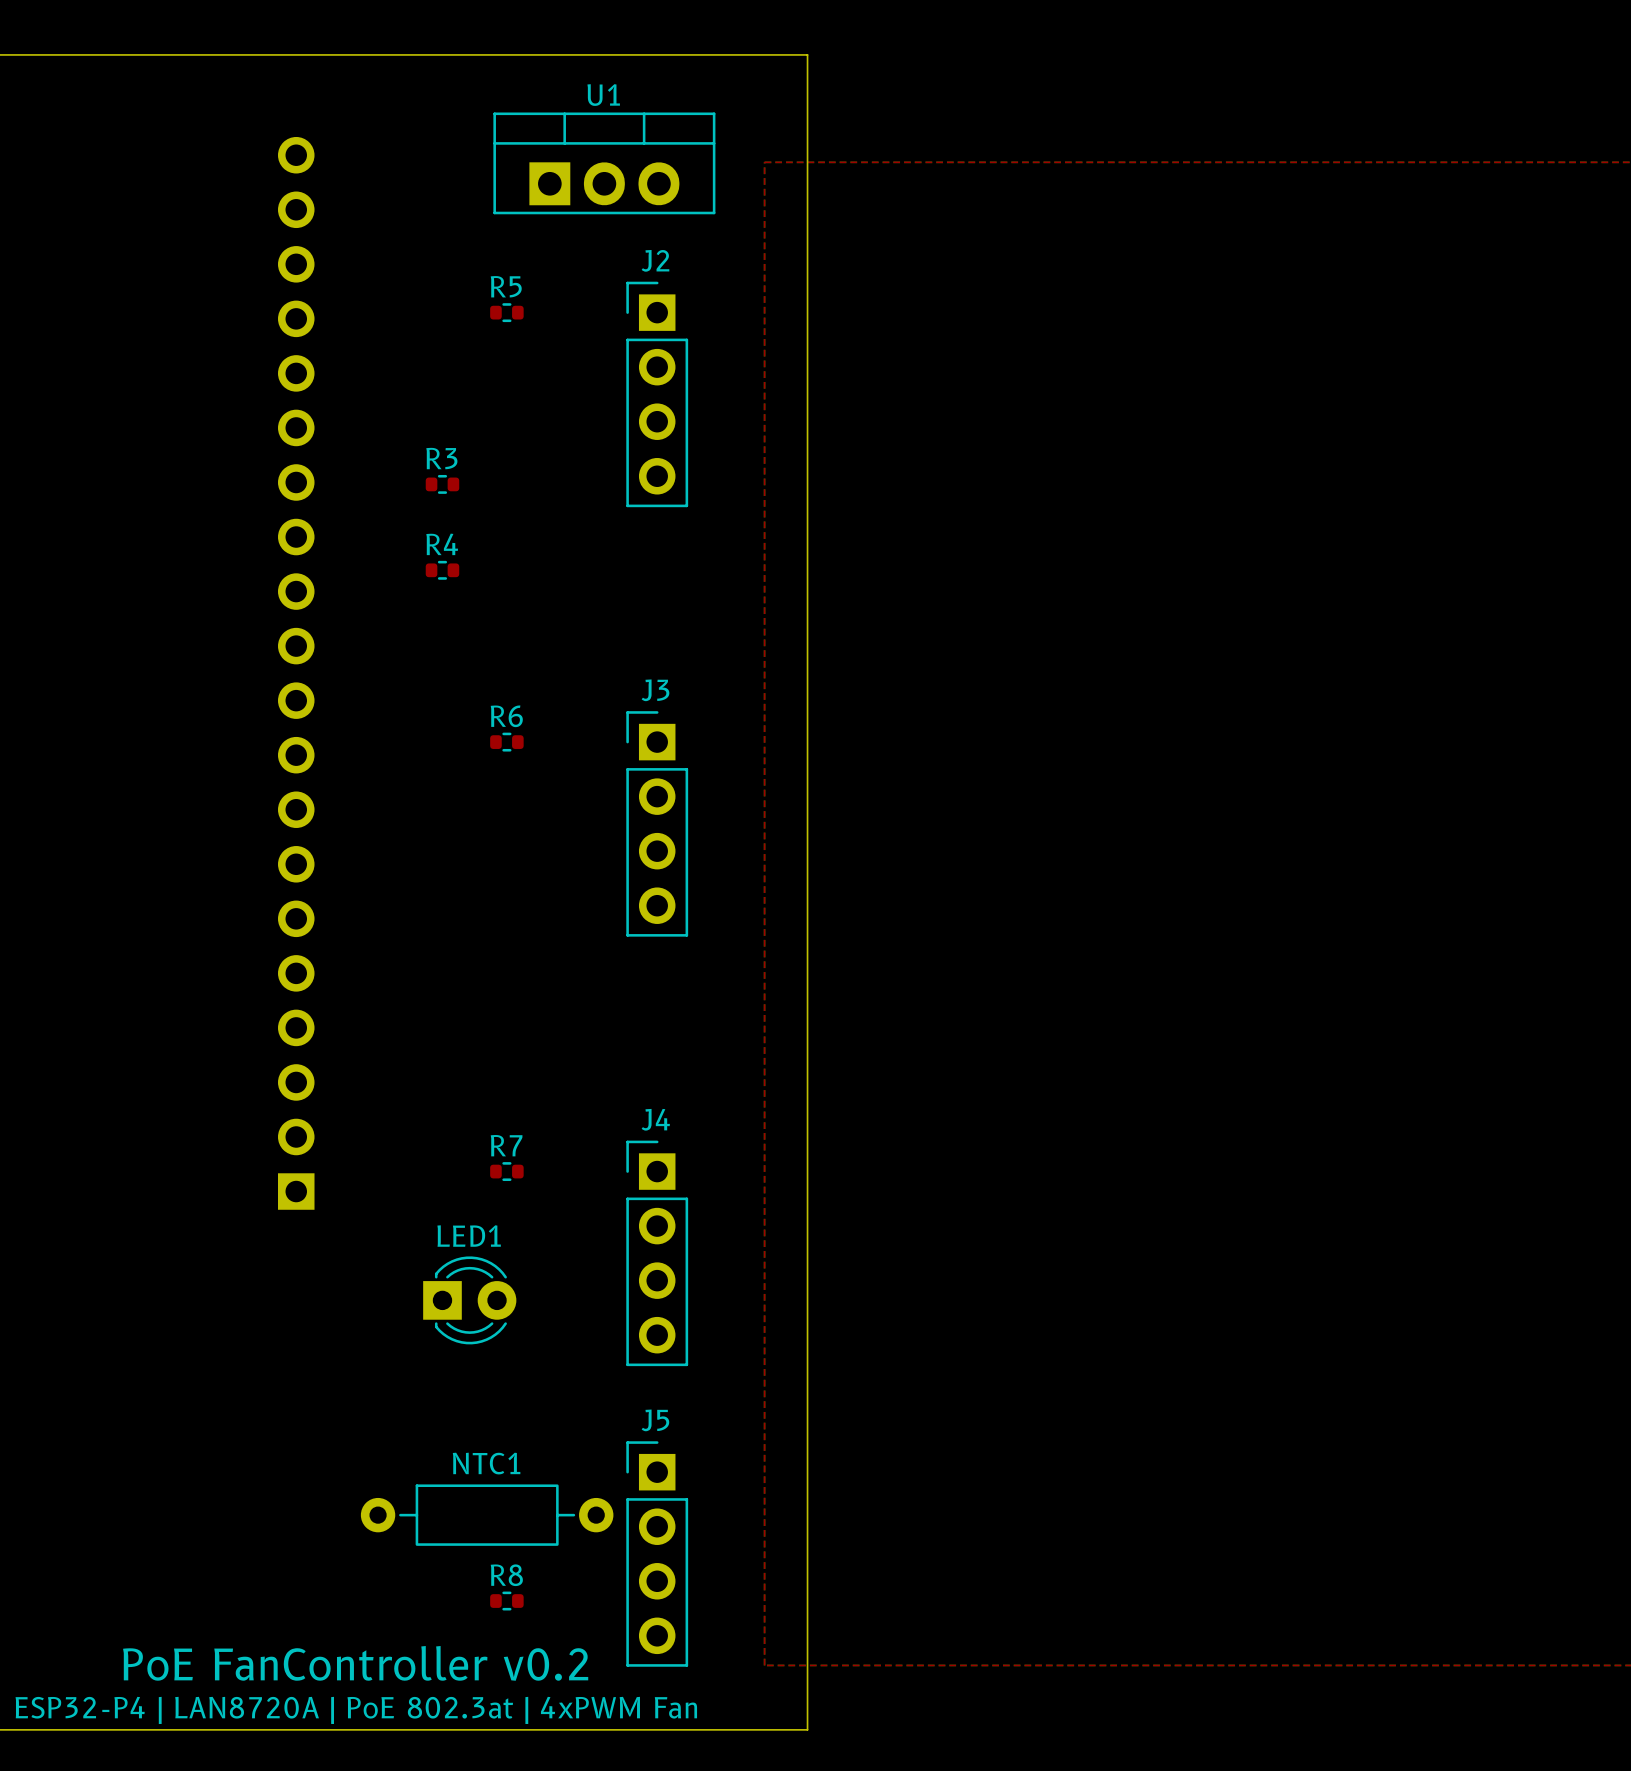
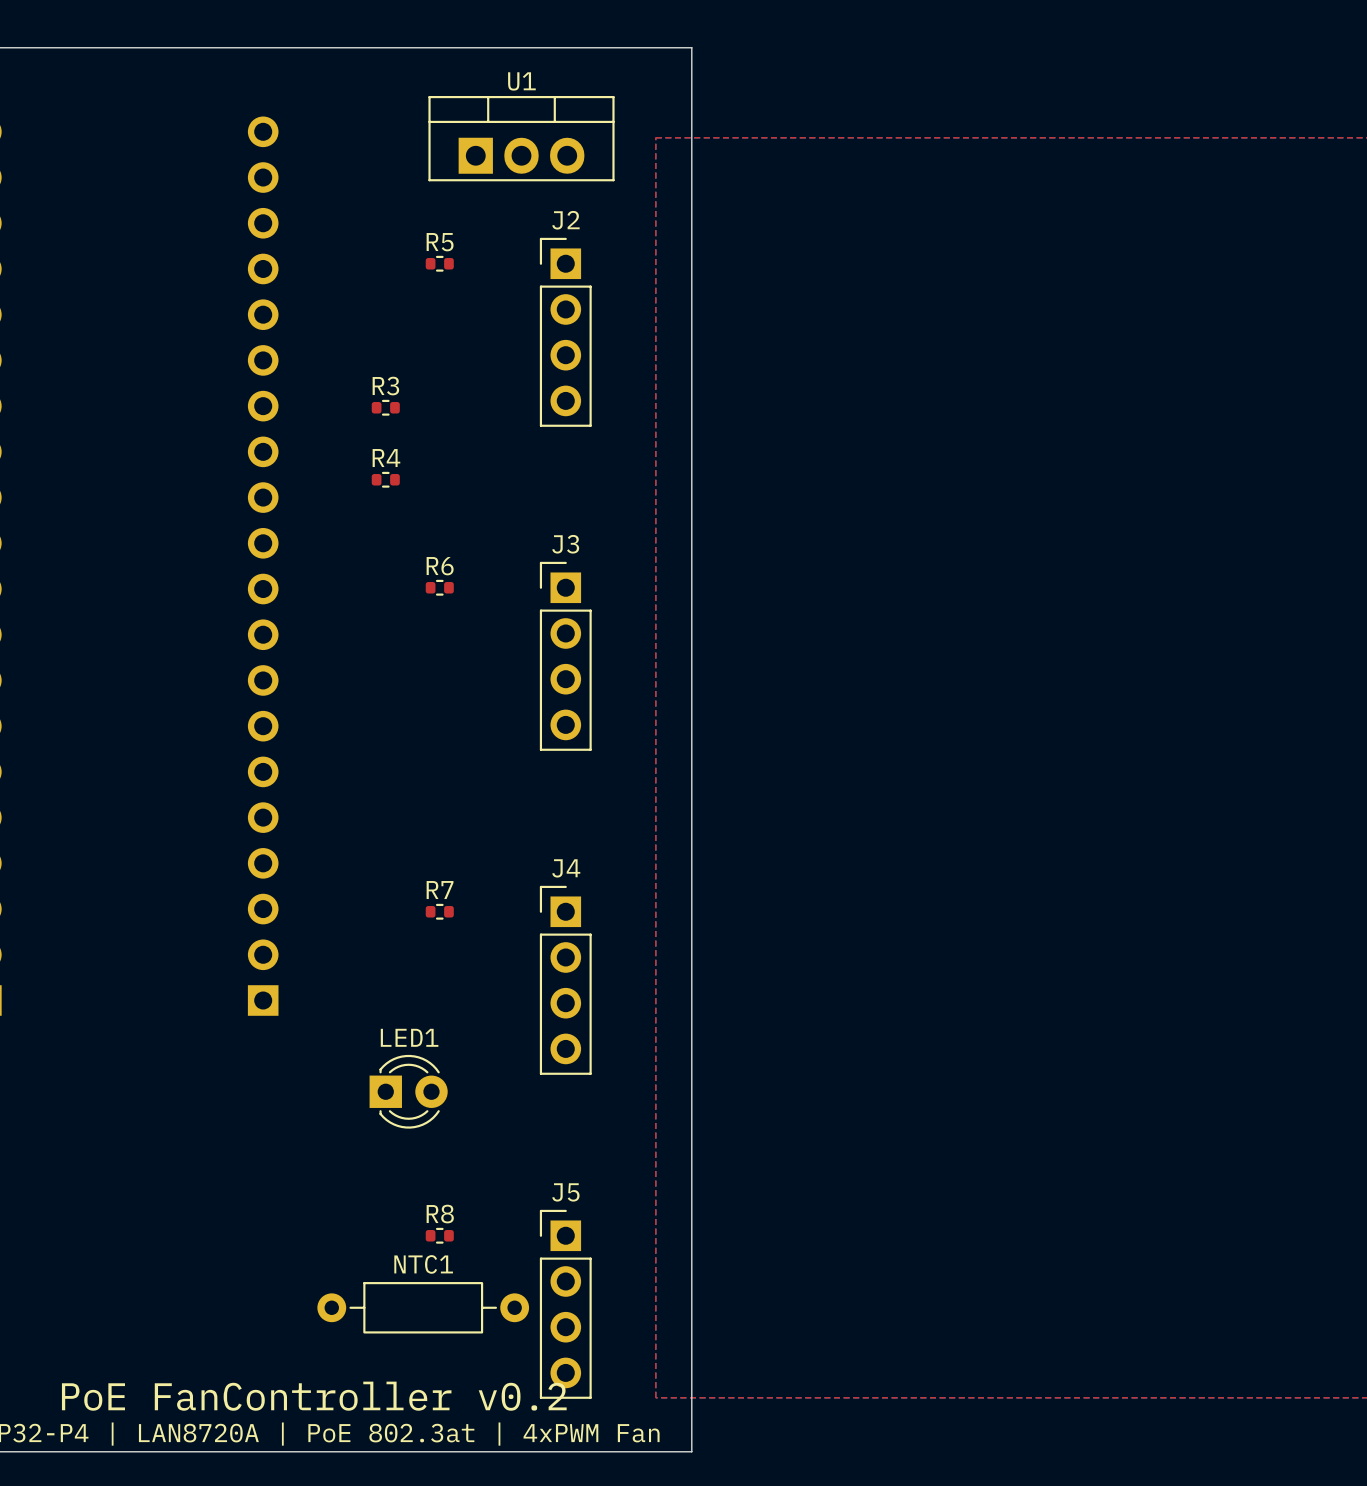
R6 position: (506, 742) -> (439, 587)
J3 position: (657, 823) -> (565, 656)
R7 position: (506, 1171) -> (439, 911)
J4 position: (657, 1253) -> (565, 980)
NTC1 position: (487, 1515) -> (423, 1307)
R8 position: (506, 1601) -> (439, 1235)

